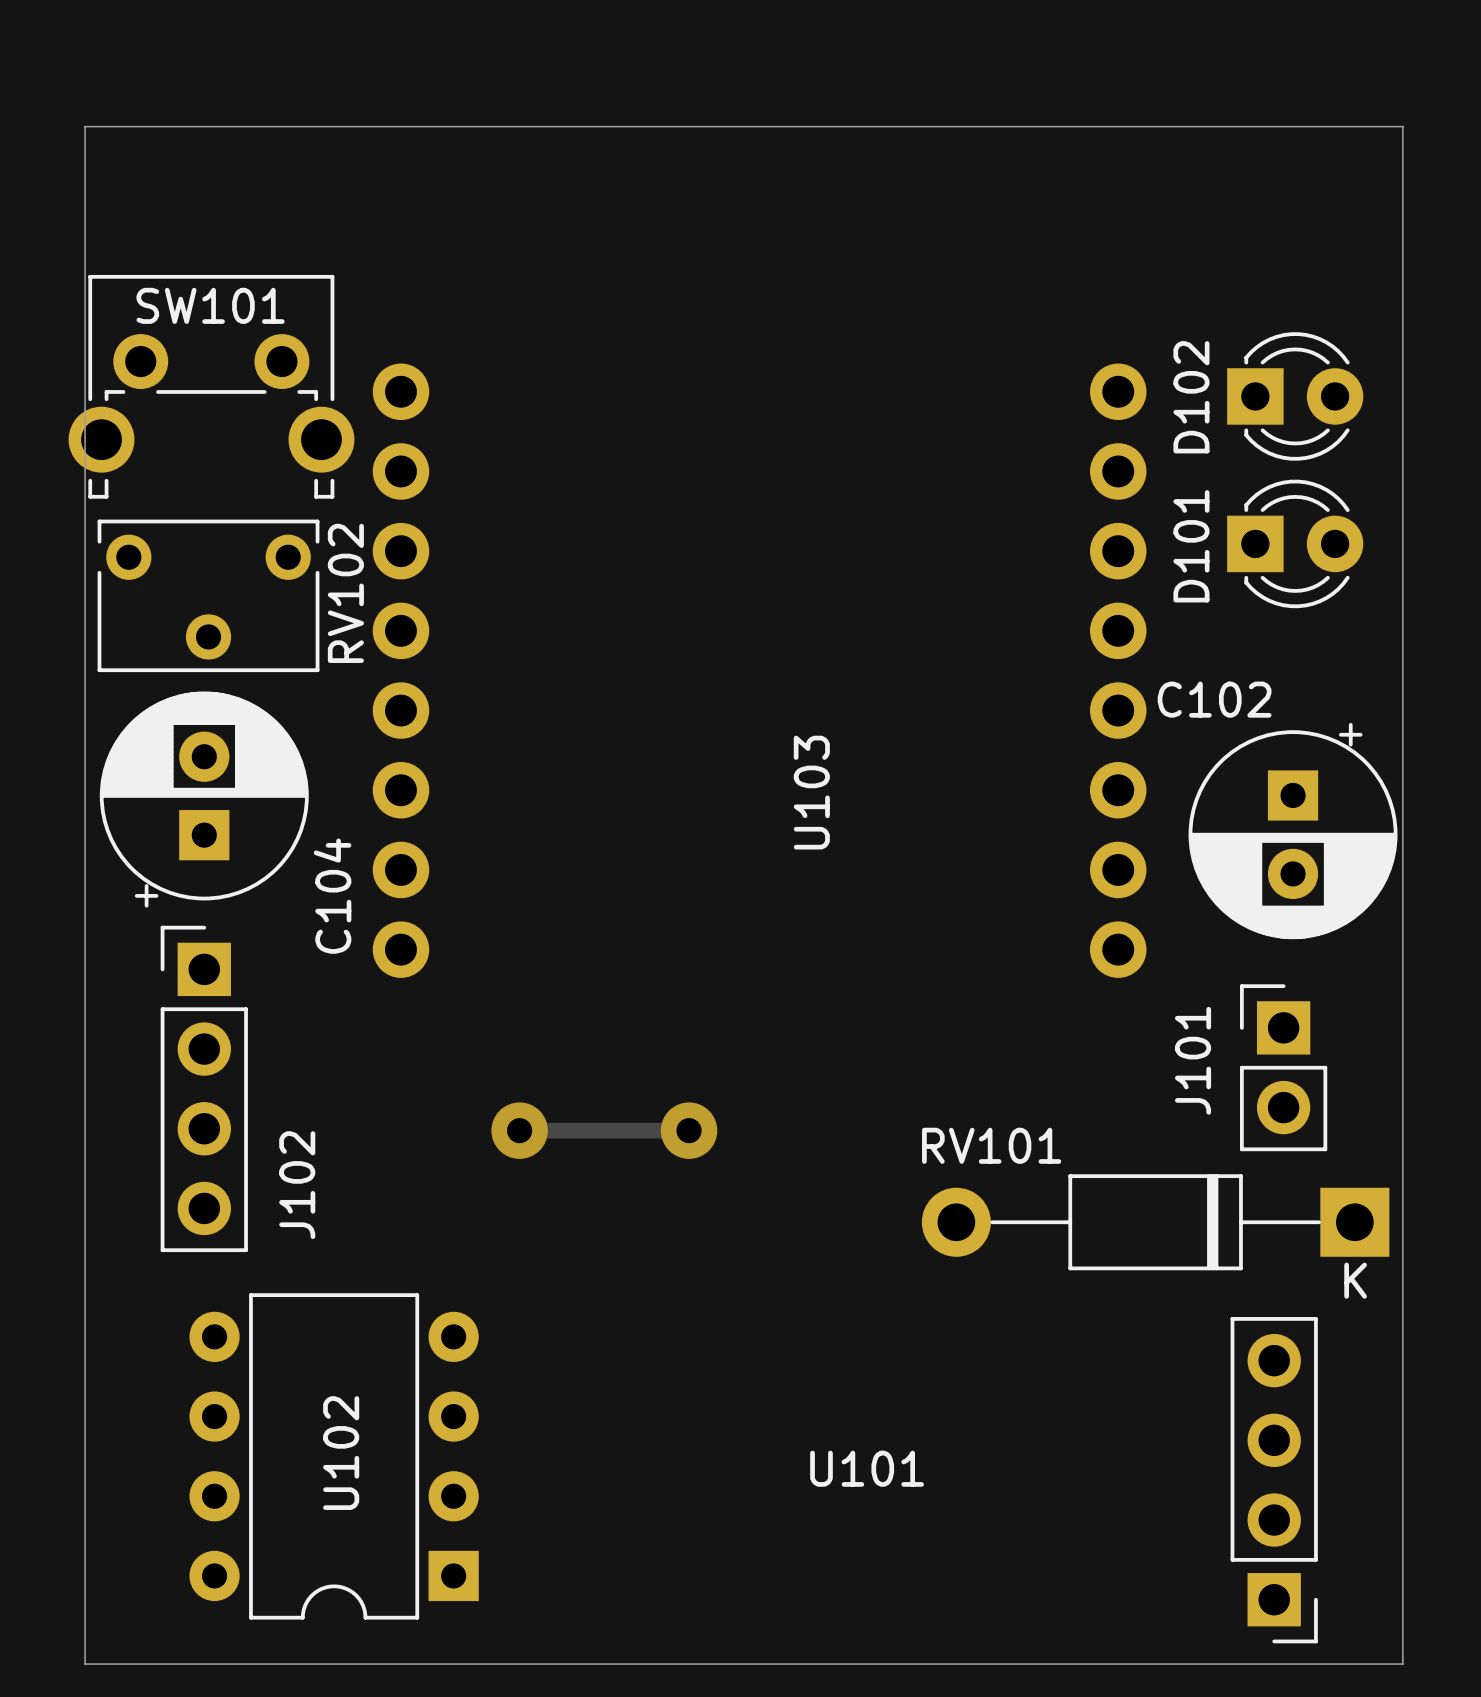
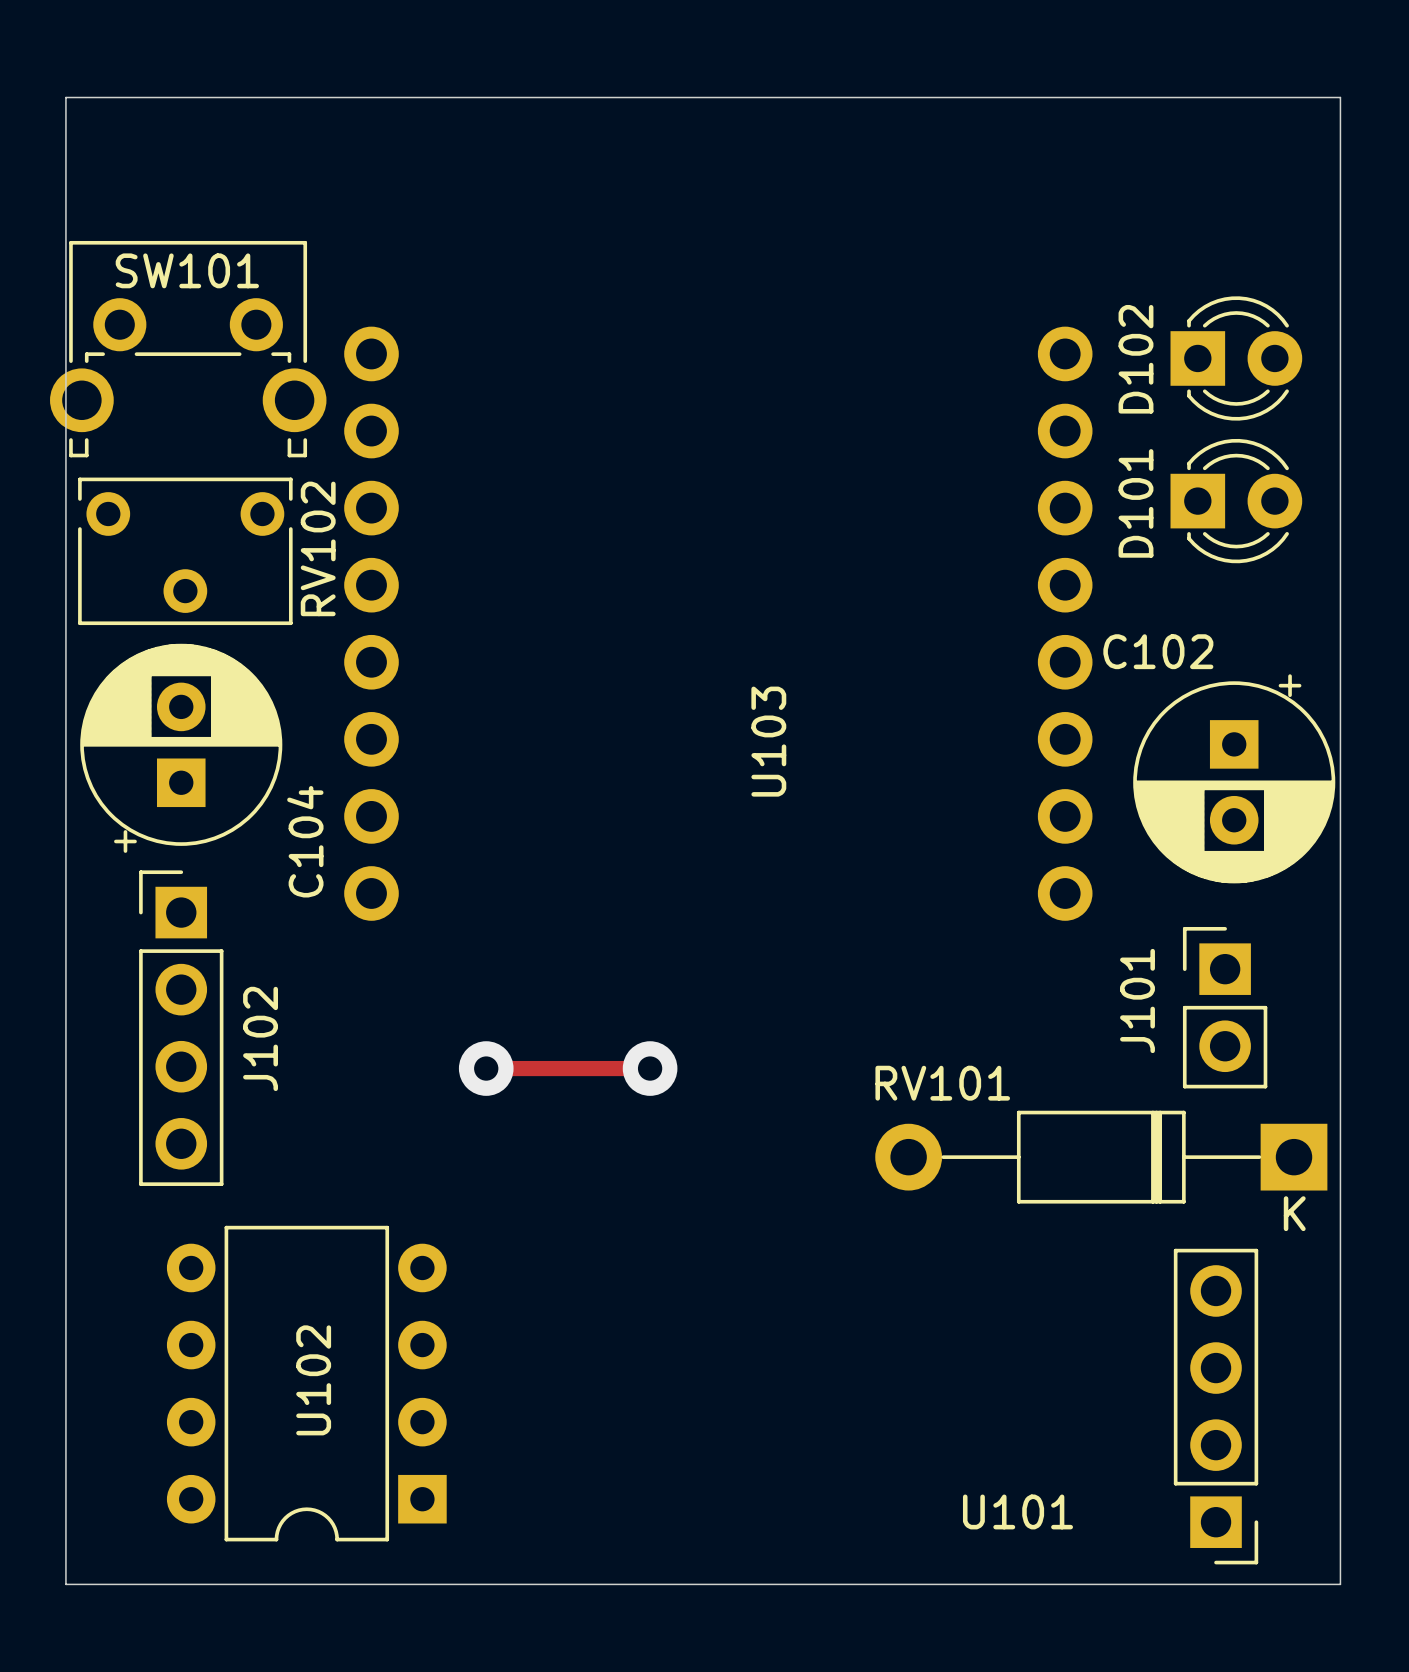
J102 name position: J102 (297, 1185) -> J102 (260, 1038)
U101 name position: U101 (867, 1468) -> U101 (1017, 1511)

